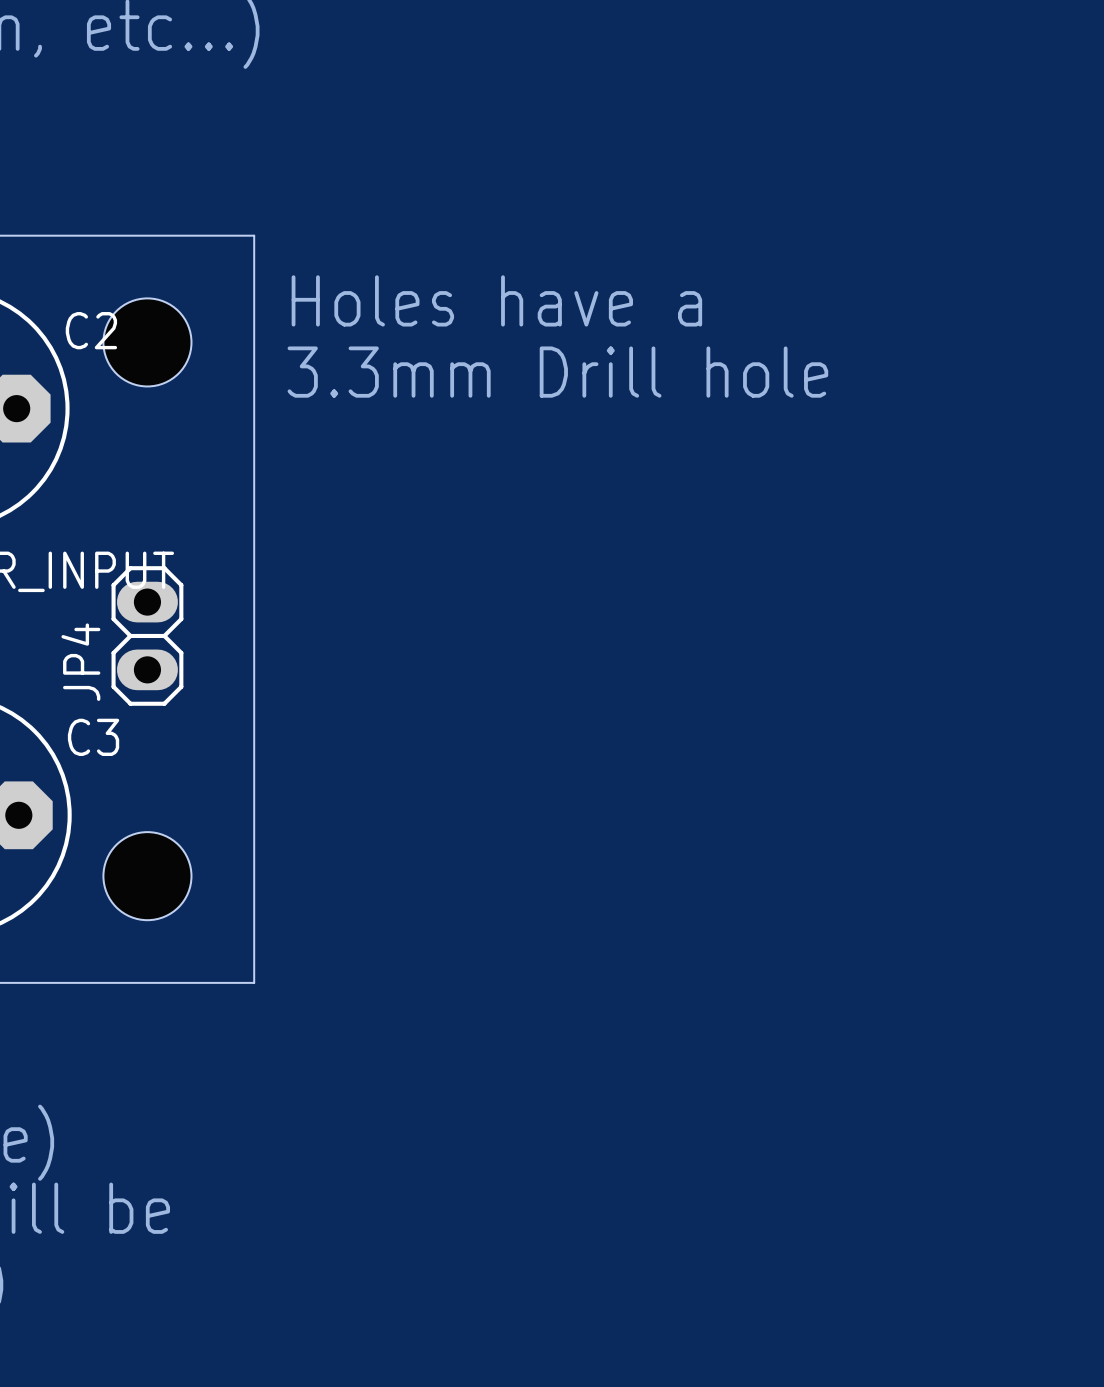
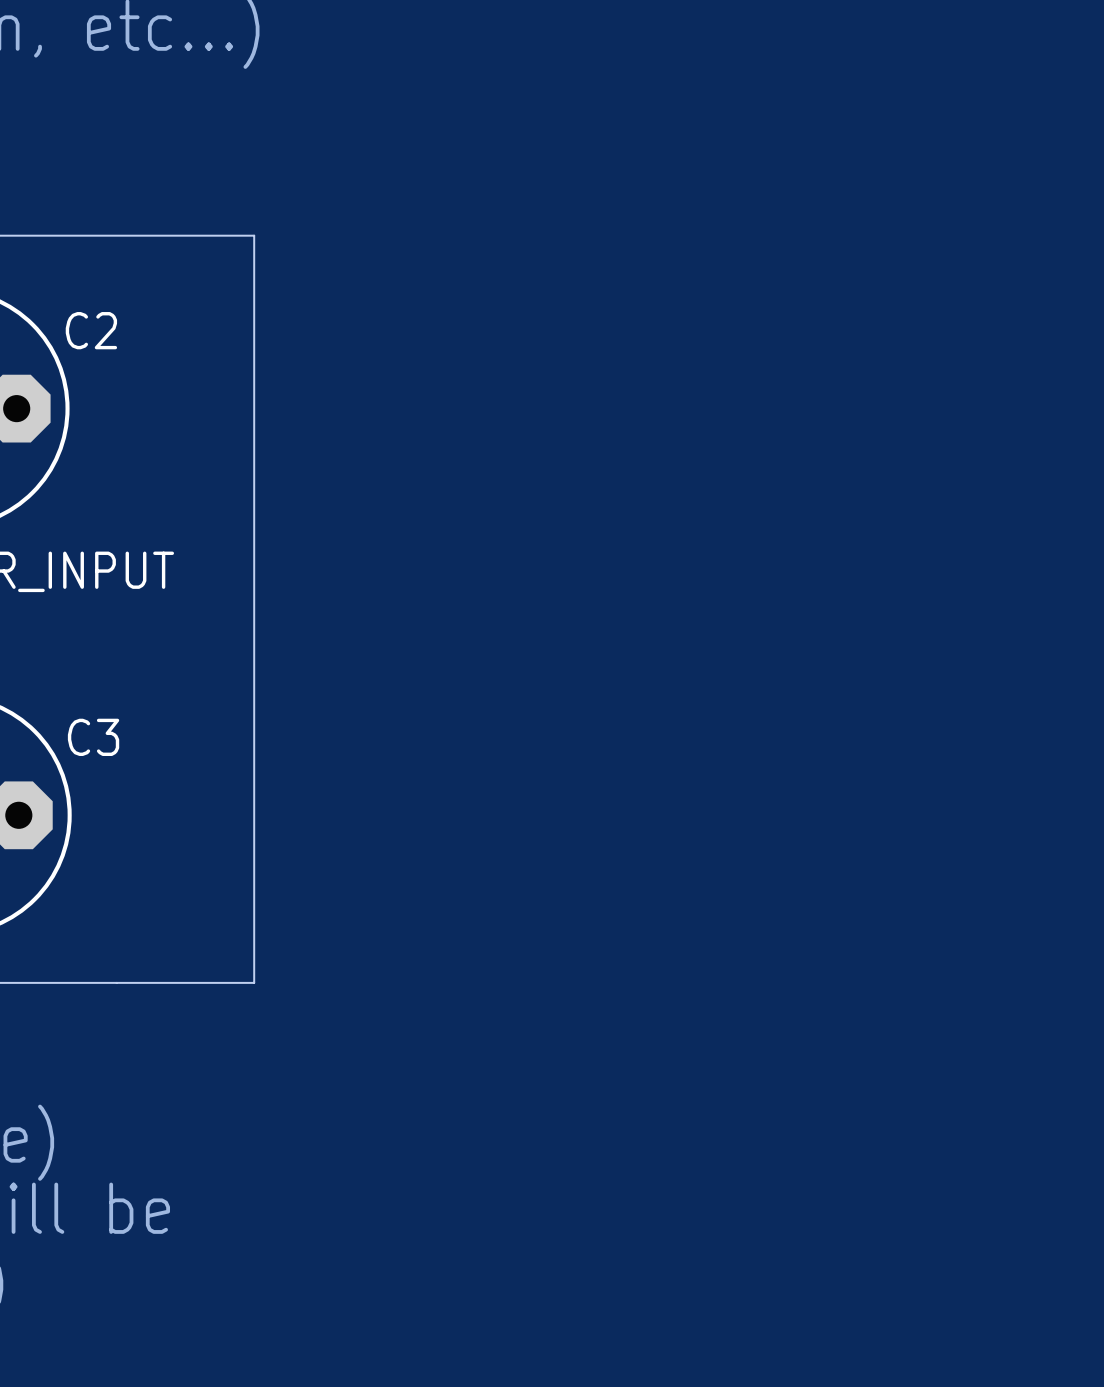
text: Holes have a (496, 300) -> none
hole: (147, 342) -> none
text: 3.3mm Drill hole (557, 372) -> none
JP4: (147, 635) -> none
hole: (147, 876) -> none

